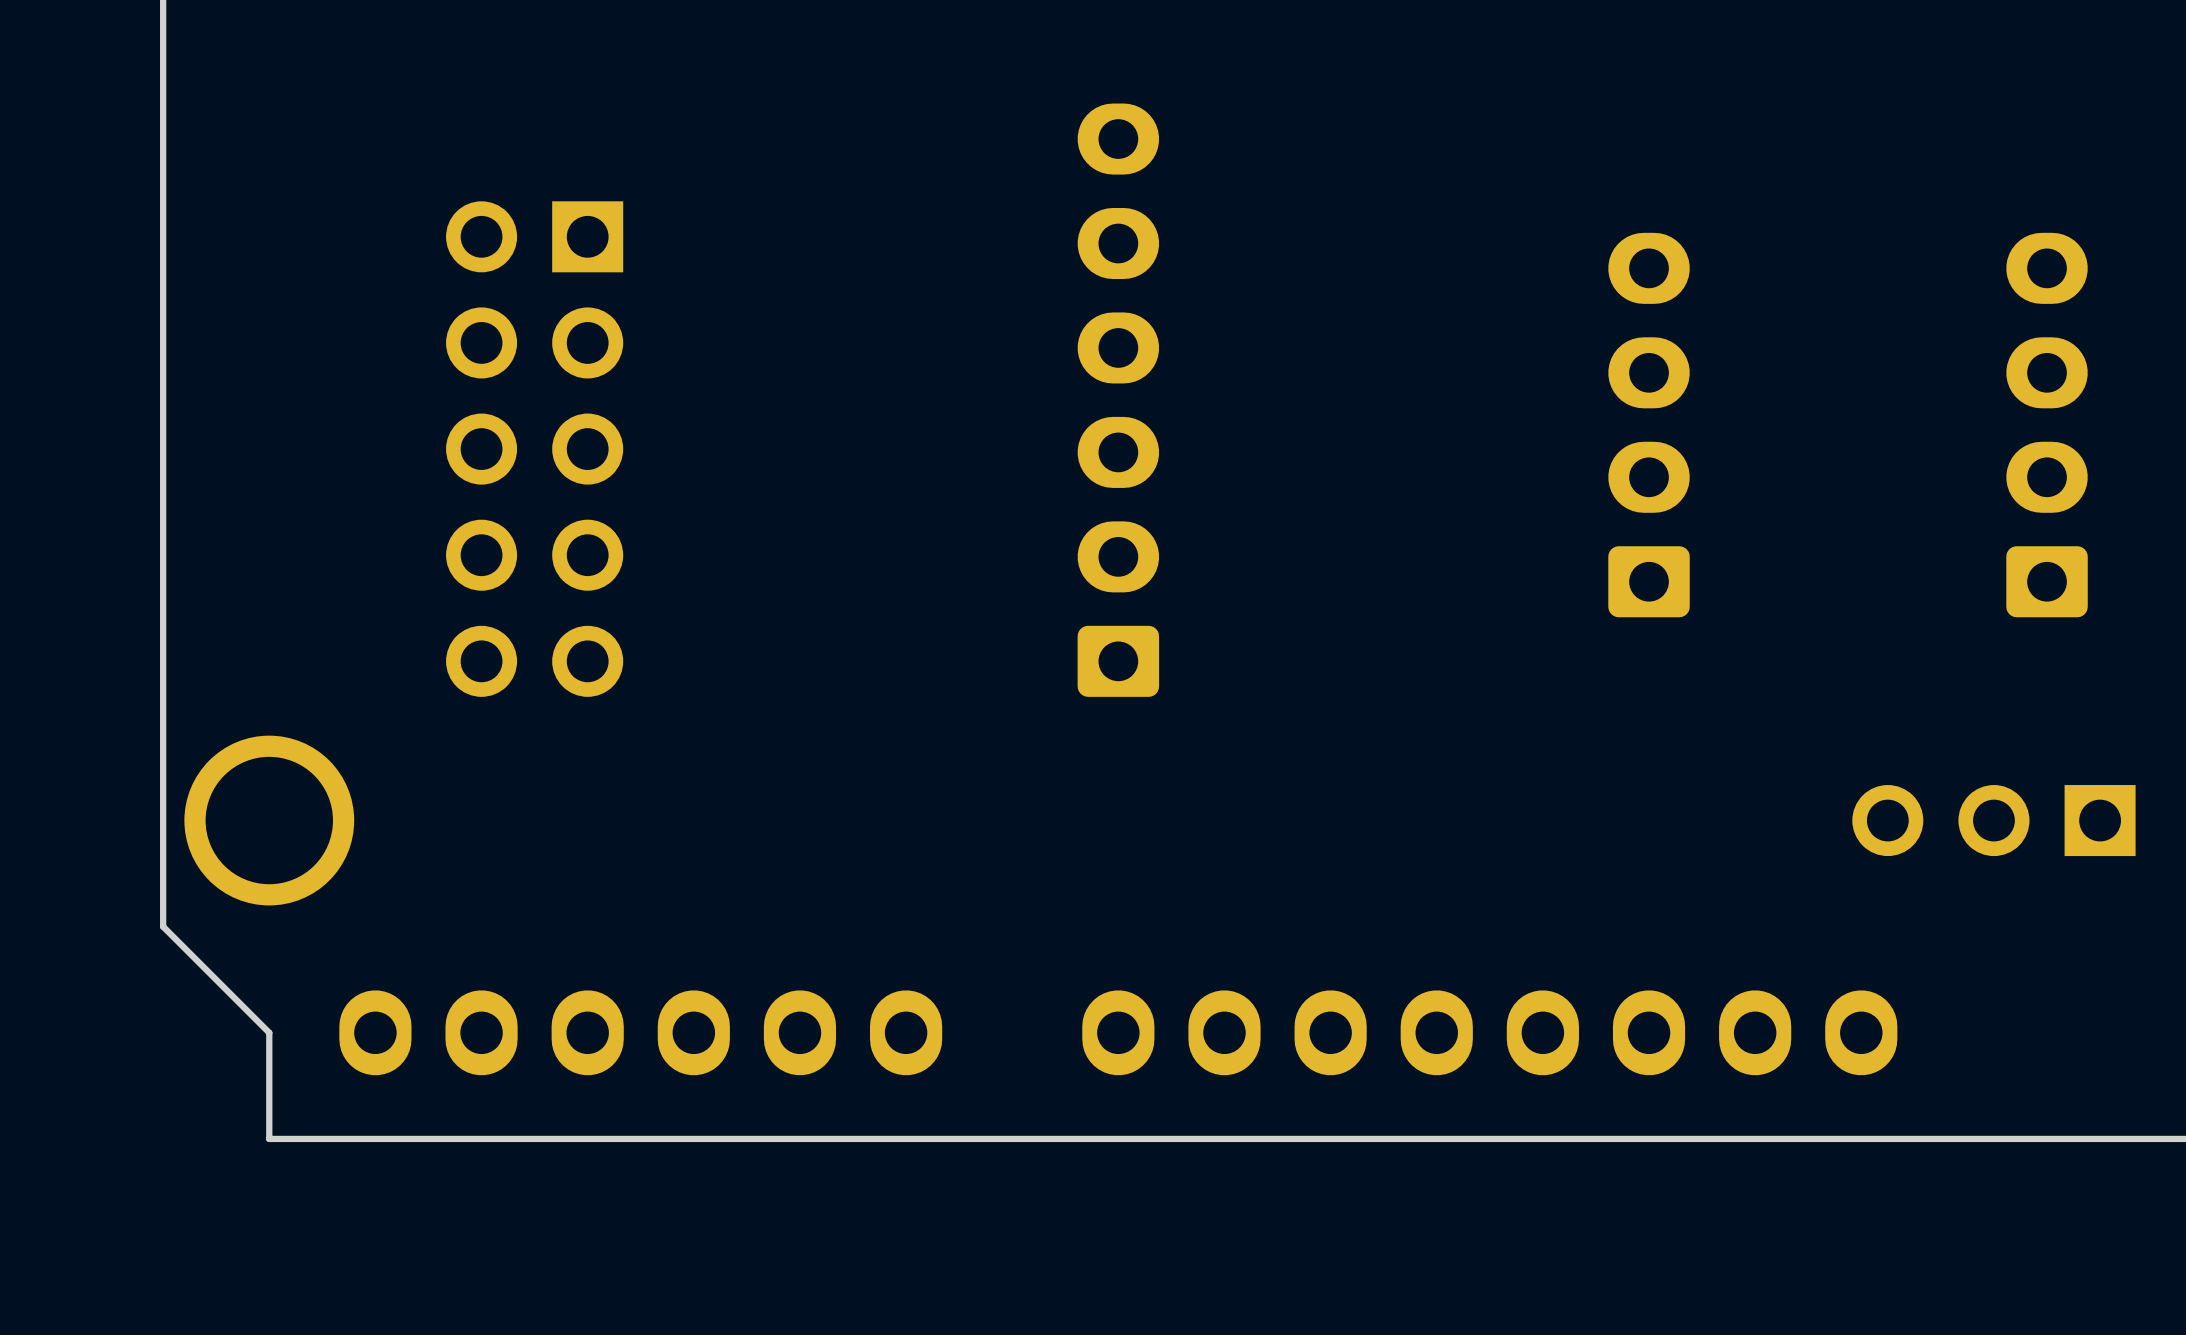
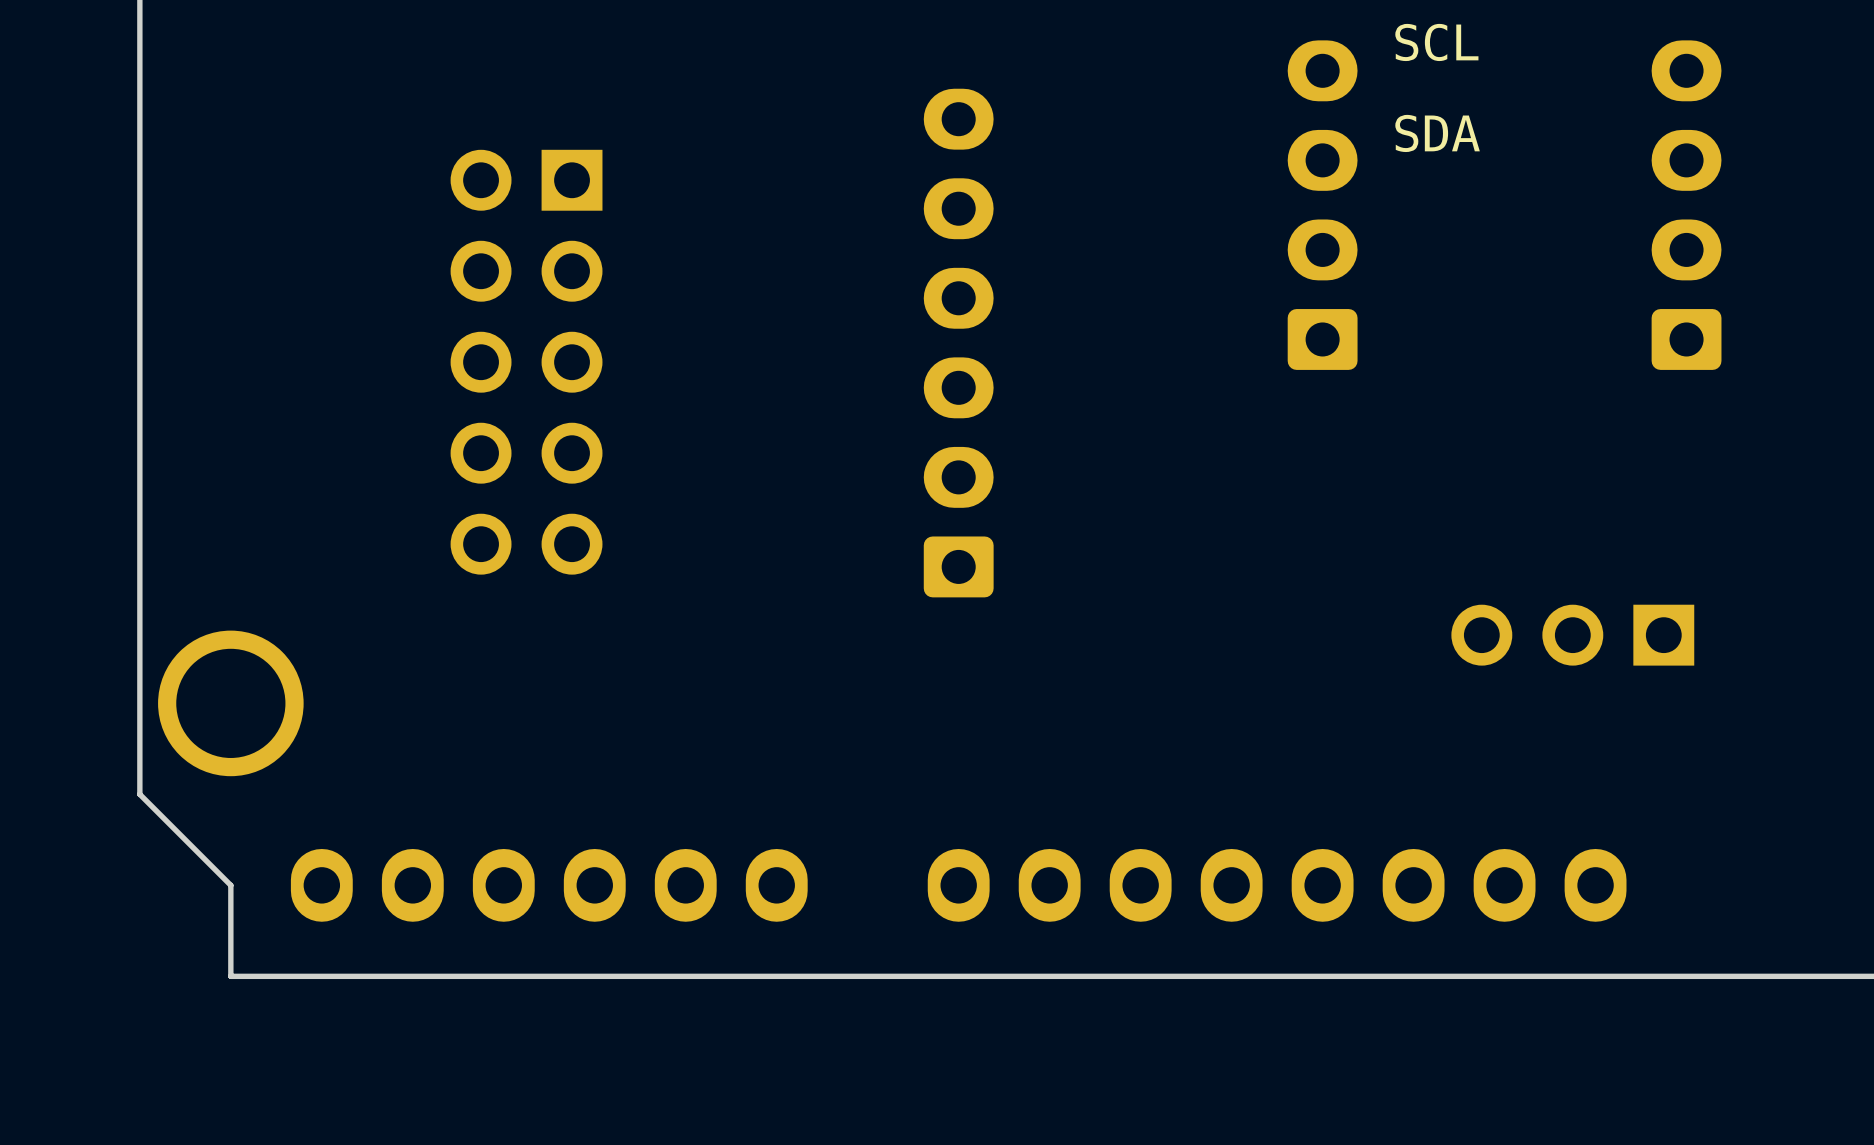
text: none -> SCL (1436, 42)
text: none -> SDA (1437, 133)
part: none -> (1322, 205)
part: none -> (1686, 205)
part: (1649, 425) -> none
part: (2047, 425) -> none
part position: (534, 449) -> (526, 362)
part position: (1993, 820) -> (1572, 635)

